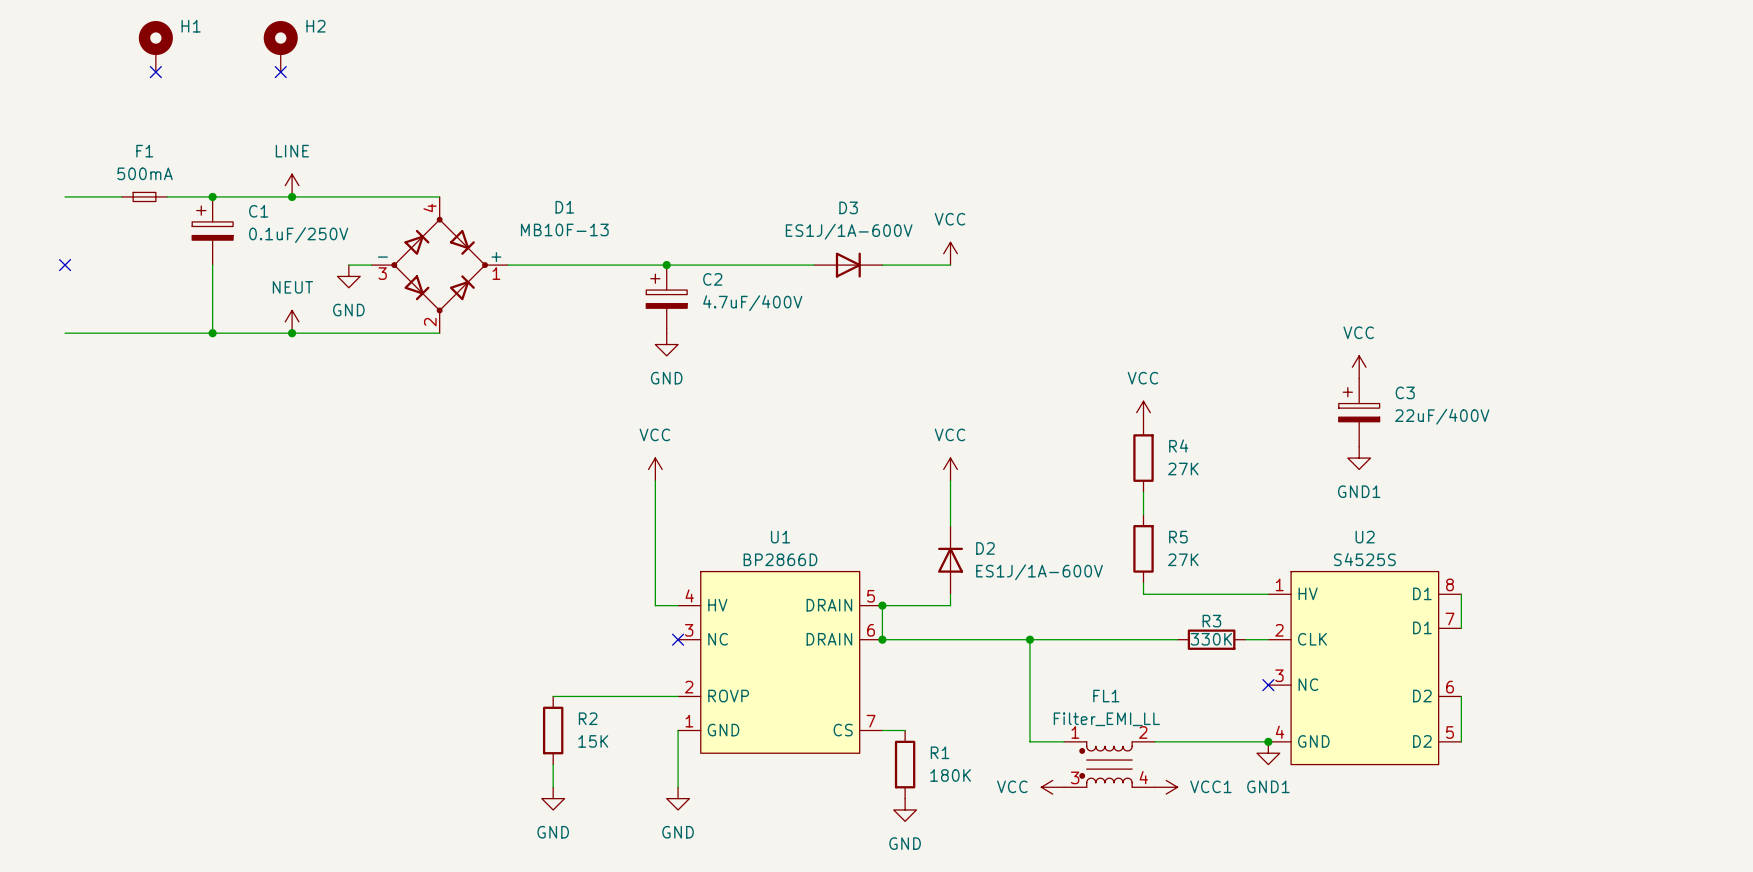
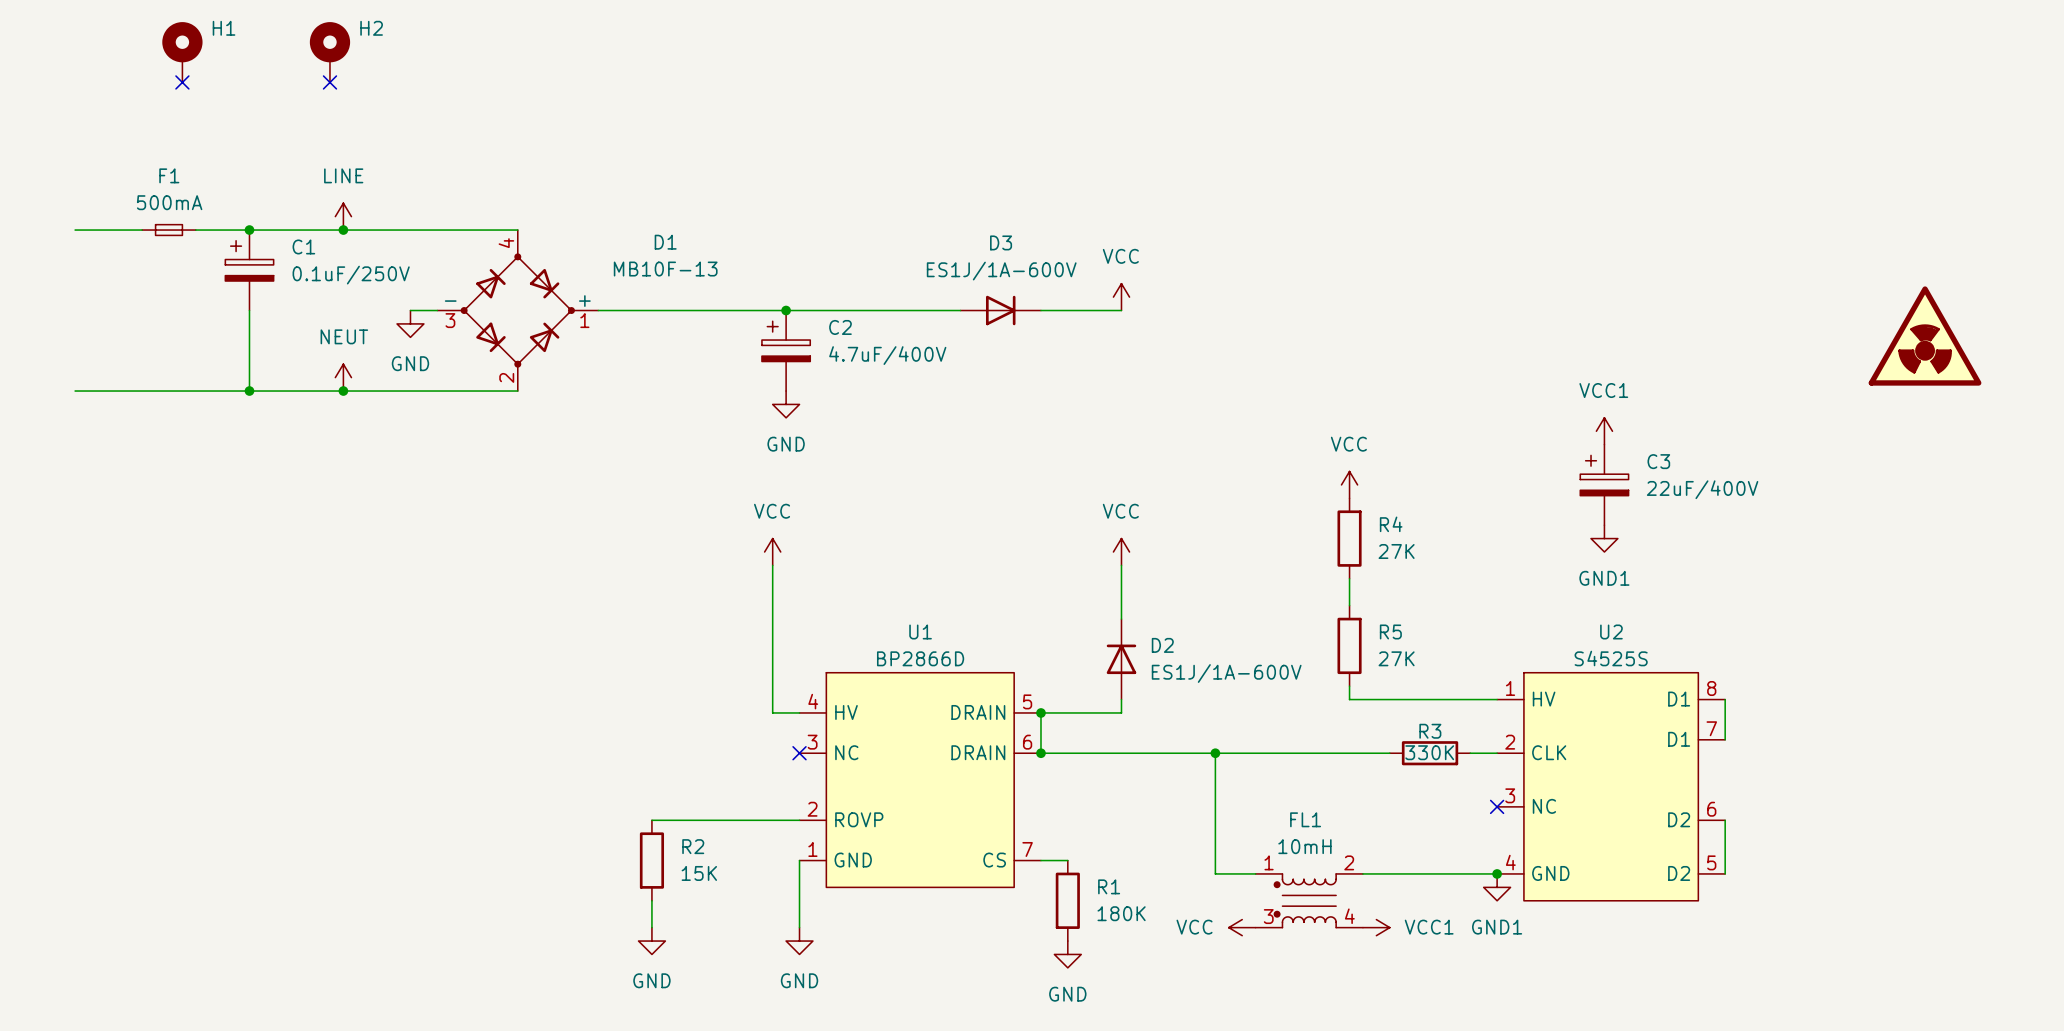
no-connect mark: (65, 265) -> none
power symbol: none -> (1925, 336)
power symbol: VCC (1359, 367) -> VCC1 (1604, 431)
FL1 value: Filter_EMI_LL (1106, 719) -> 10mH (1304, 846)

